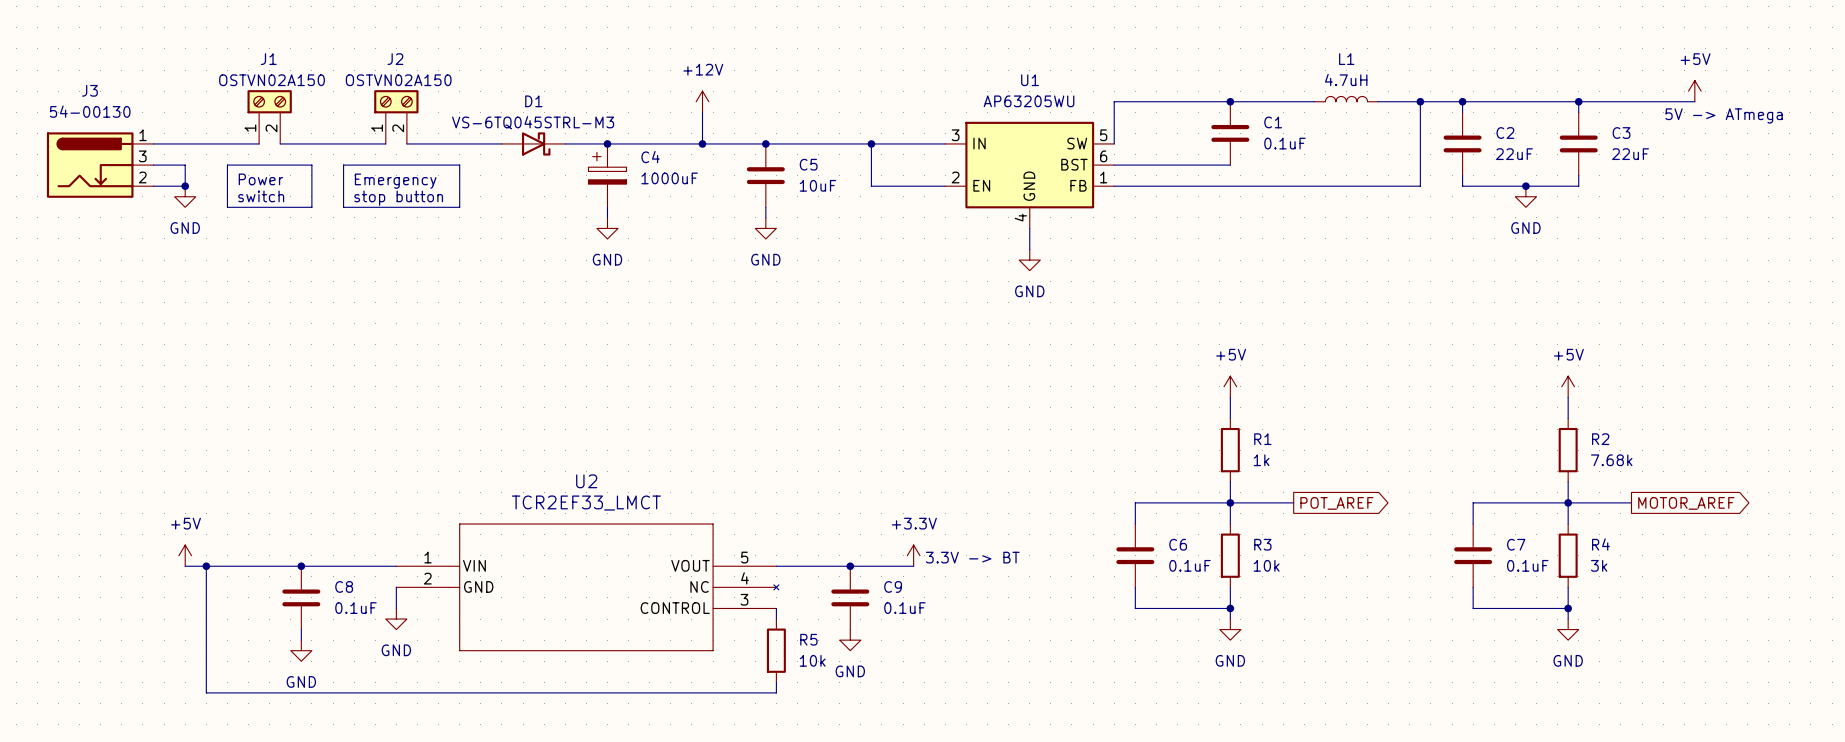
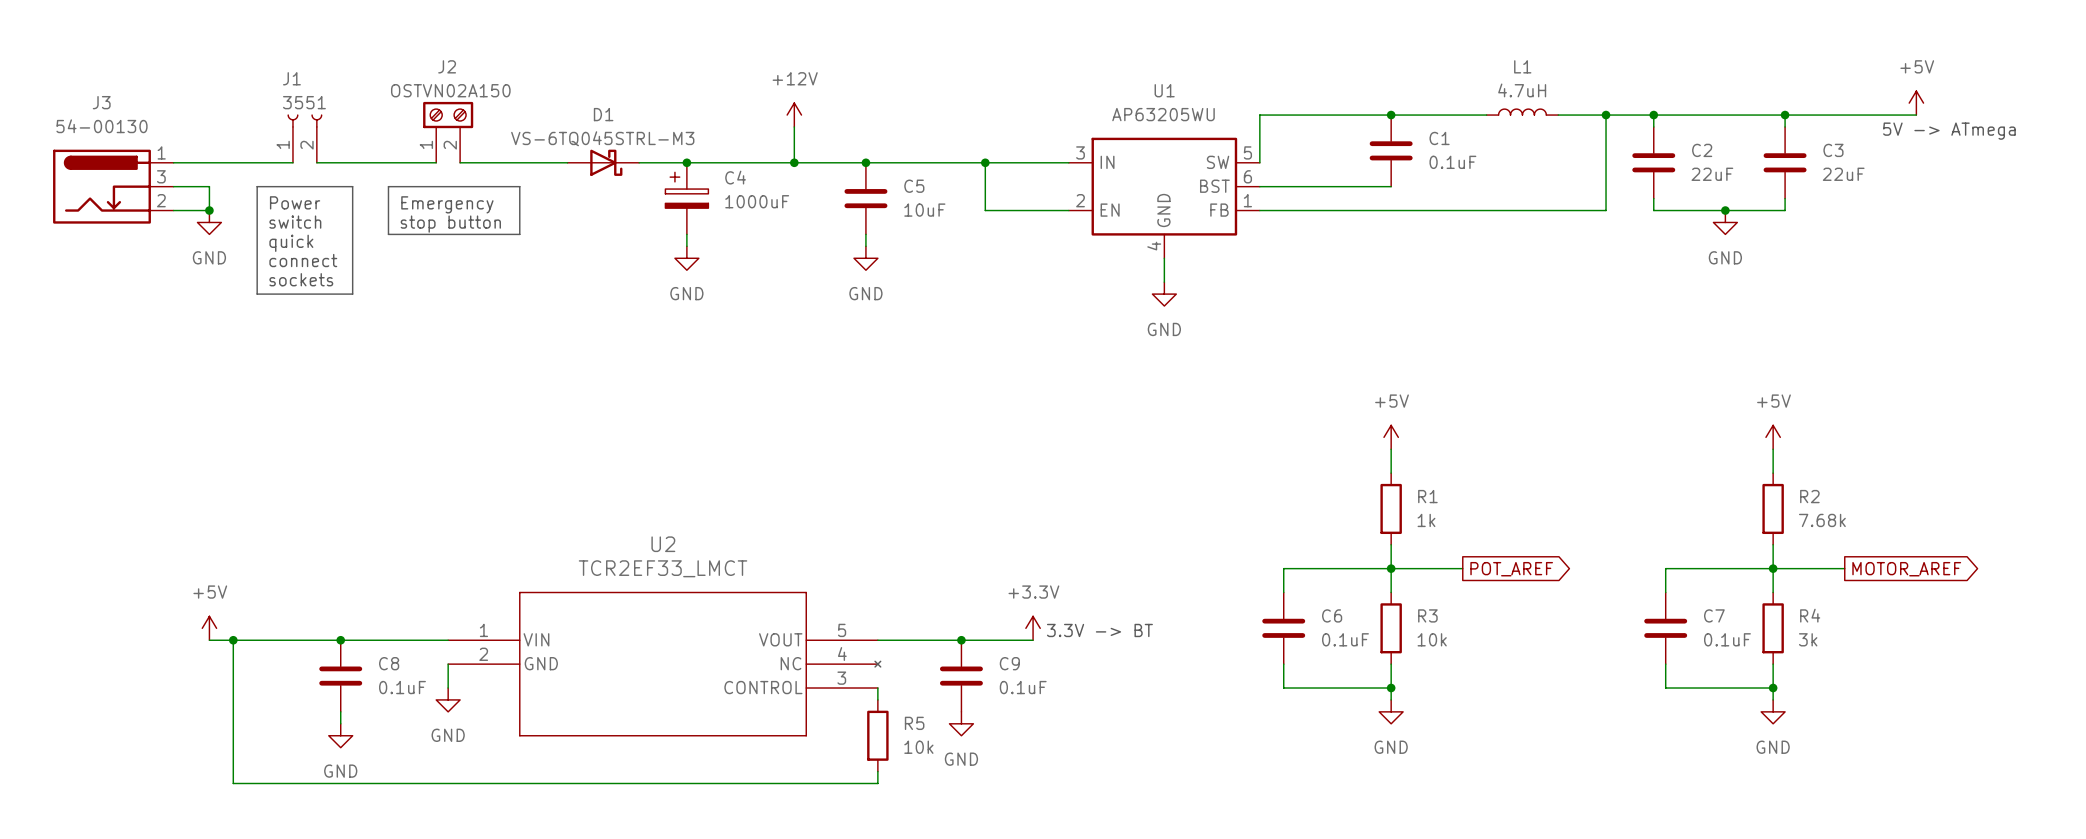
J1 value: OSTVN02A150 (272, 80) -> 3551 (304, 102)
J1 symbol: [247, 90, 292, 144] -> [287, 114, 323, 163]
line: (227, 207) (311, 207) -> (257, 234) (257, 294) (352, 294) (352, 234)
text: none -> quick (291, 243)
text: none -> connect (303, 260)
text: none -> sockets (301, 279)

